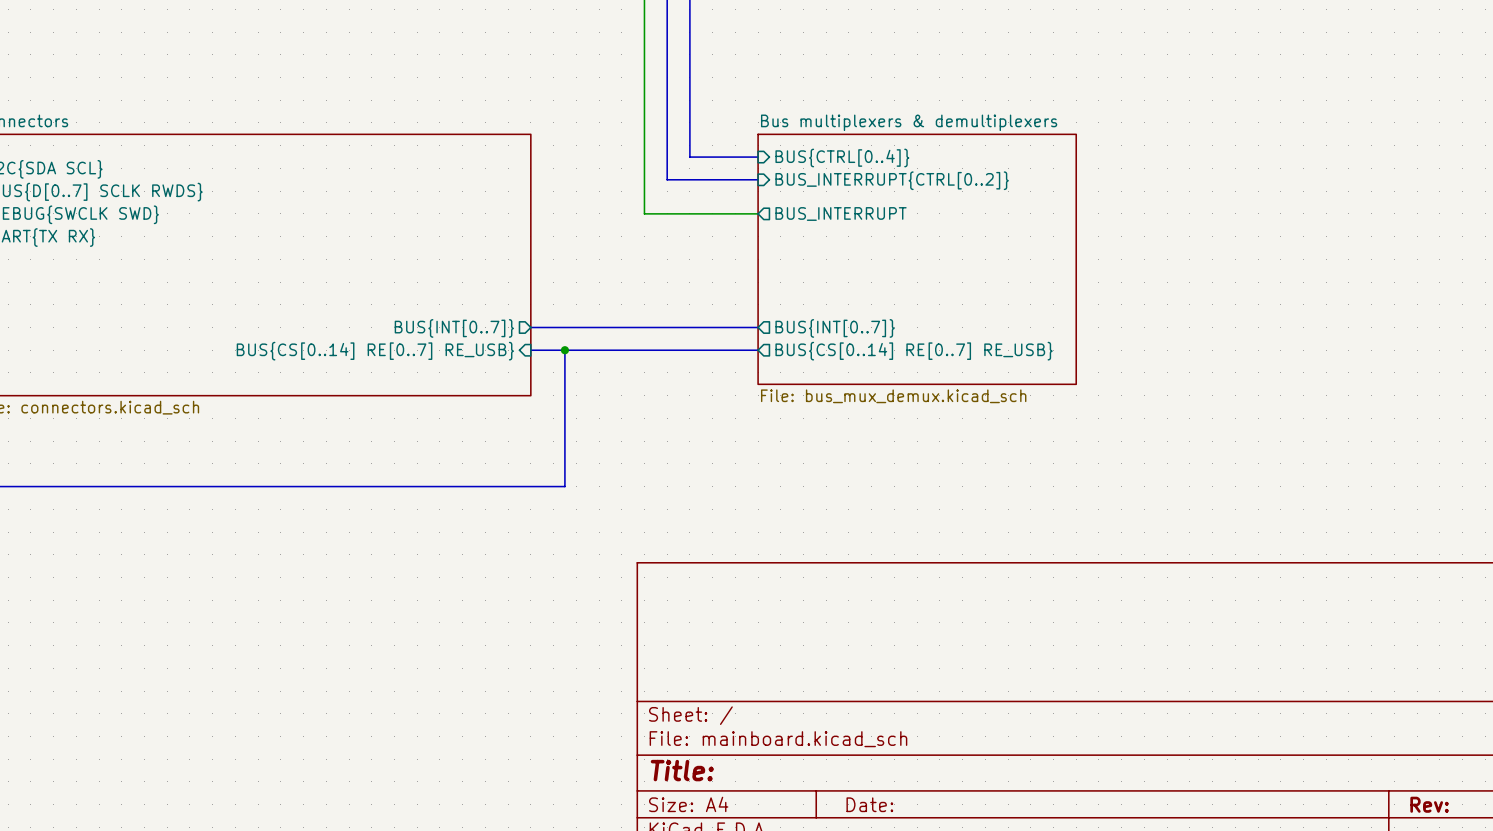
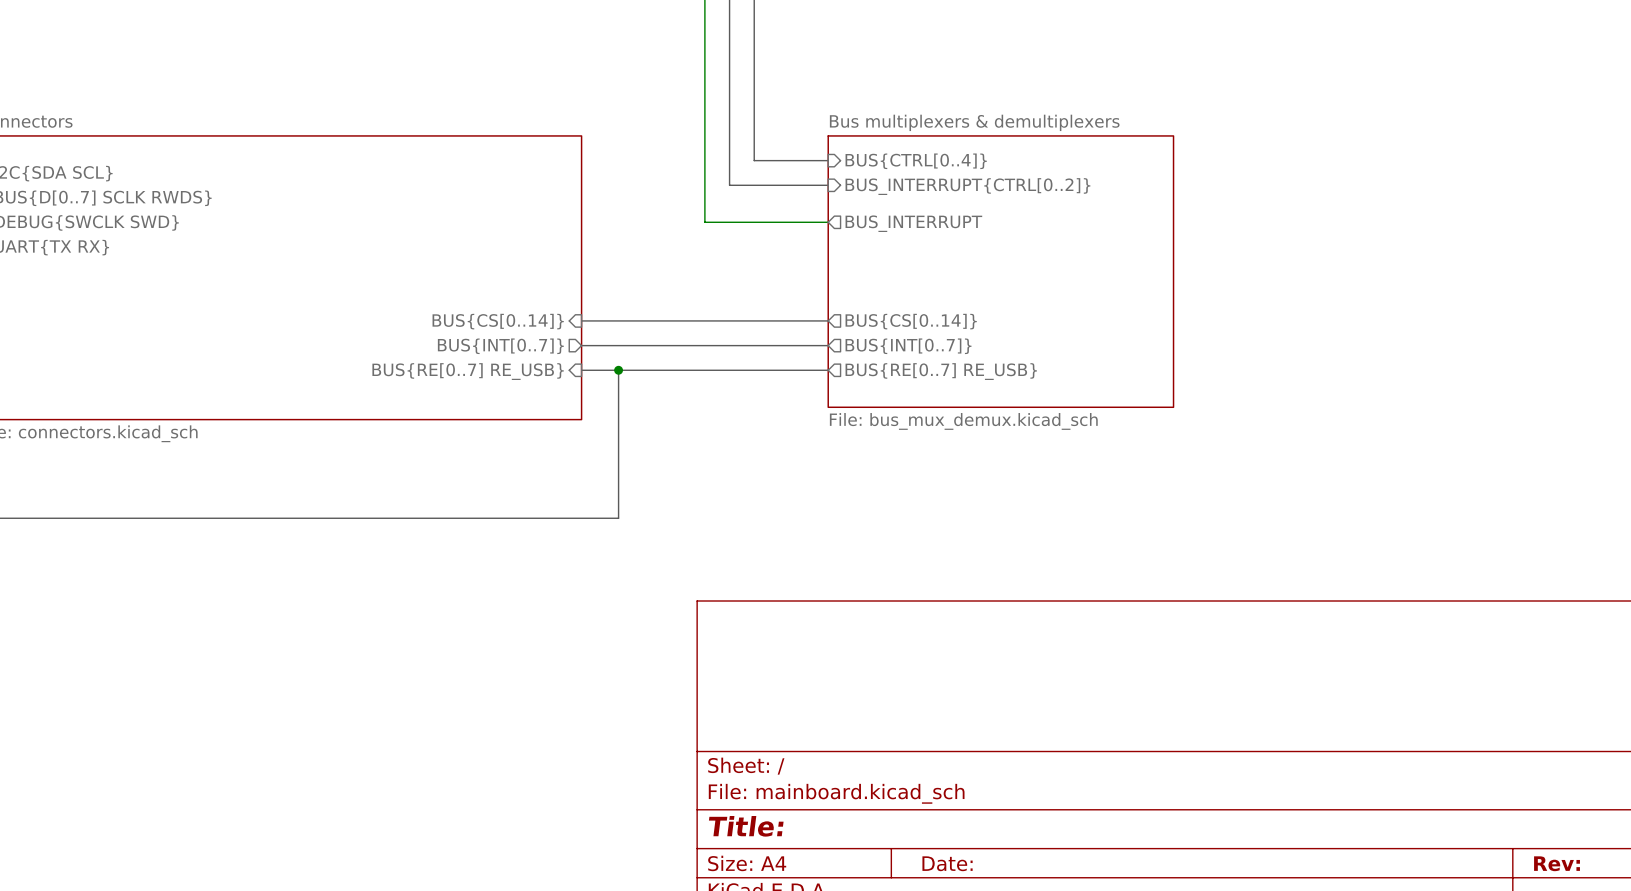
bus: none -> (581, 320) (828, 320)
sheet pin: none -> BUS{CS[0..14]} (498, 321)
sheet pin: none -> BUS{CS[0..14]} (911, 321)
sheet pin: BUS{CS[0..14] RE[0..7] RE_USB} (375, 351) -> BUS{RE[0..7] RE_USB} (468, 371)
sheet pin: BUS{CS[0..14] RE[0..7] RE_USB} (914, 351) -> BUS{RE[0..7] RE_USB} (941, 371)

